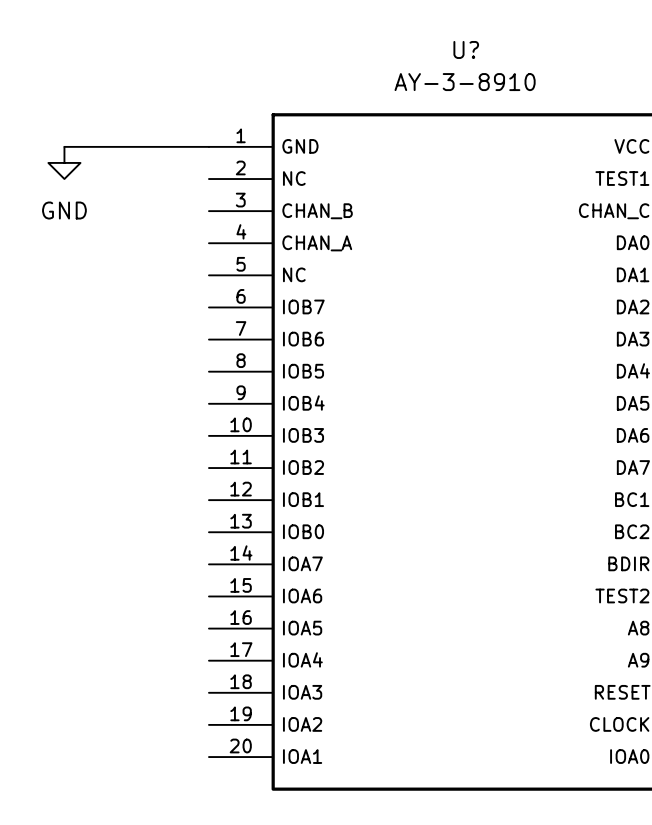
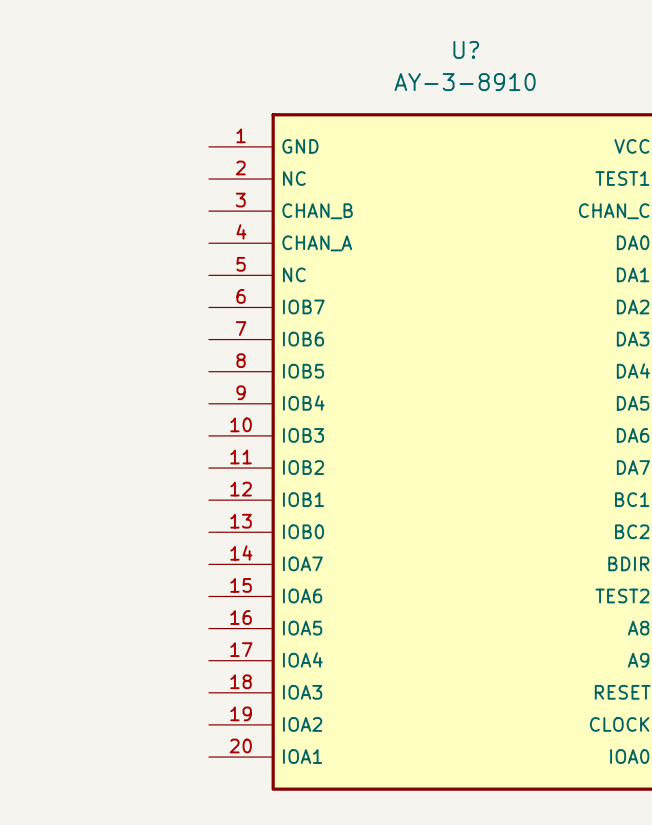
wire: (64, 146) (208, 146) -> none
power symbol: GND (64, 162) -> none

